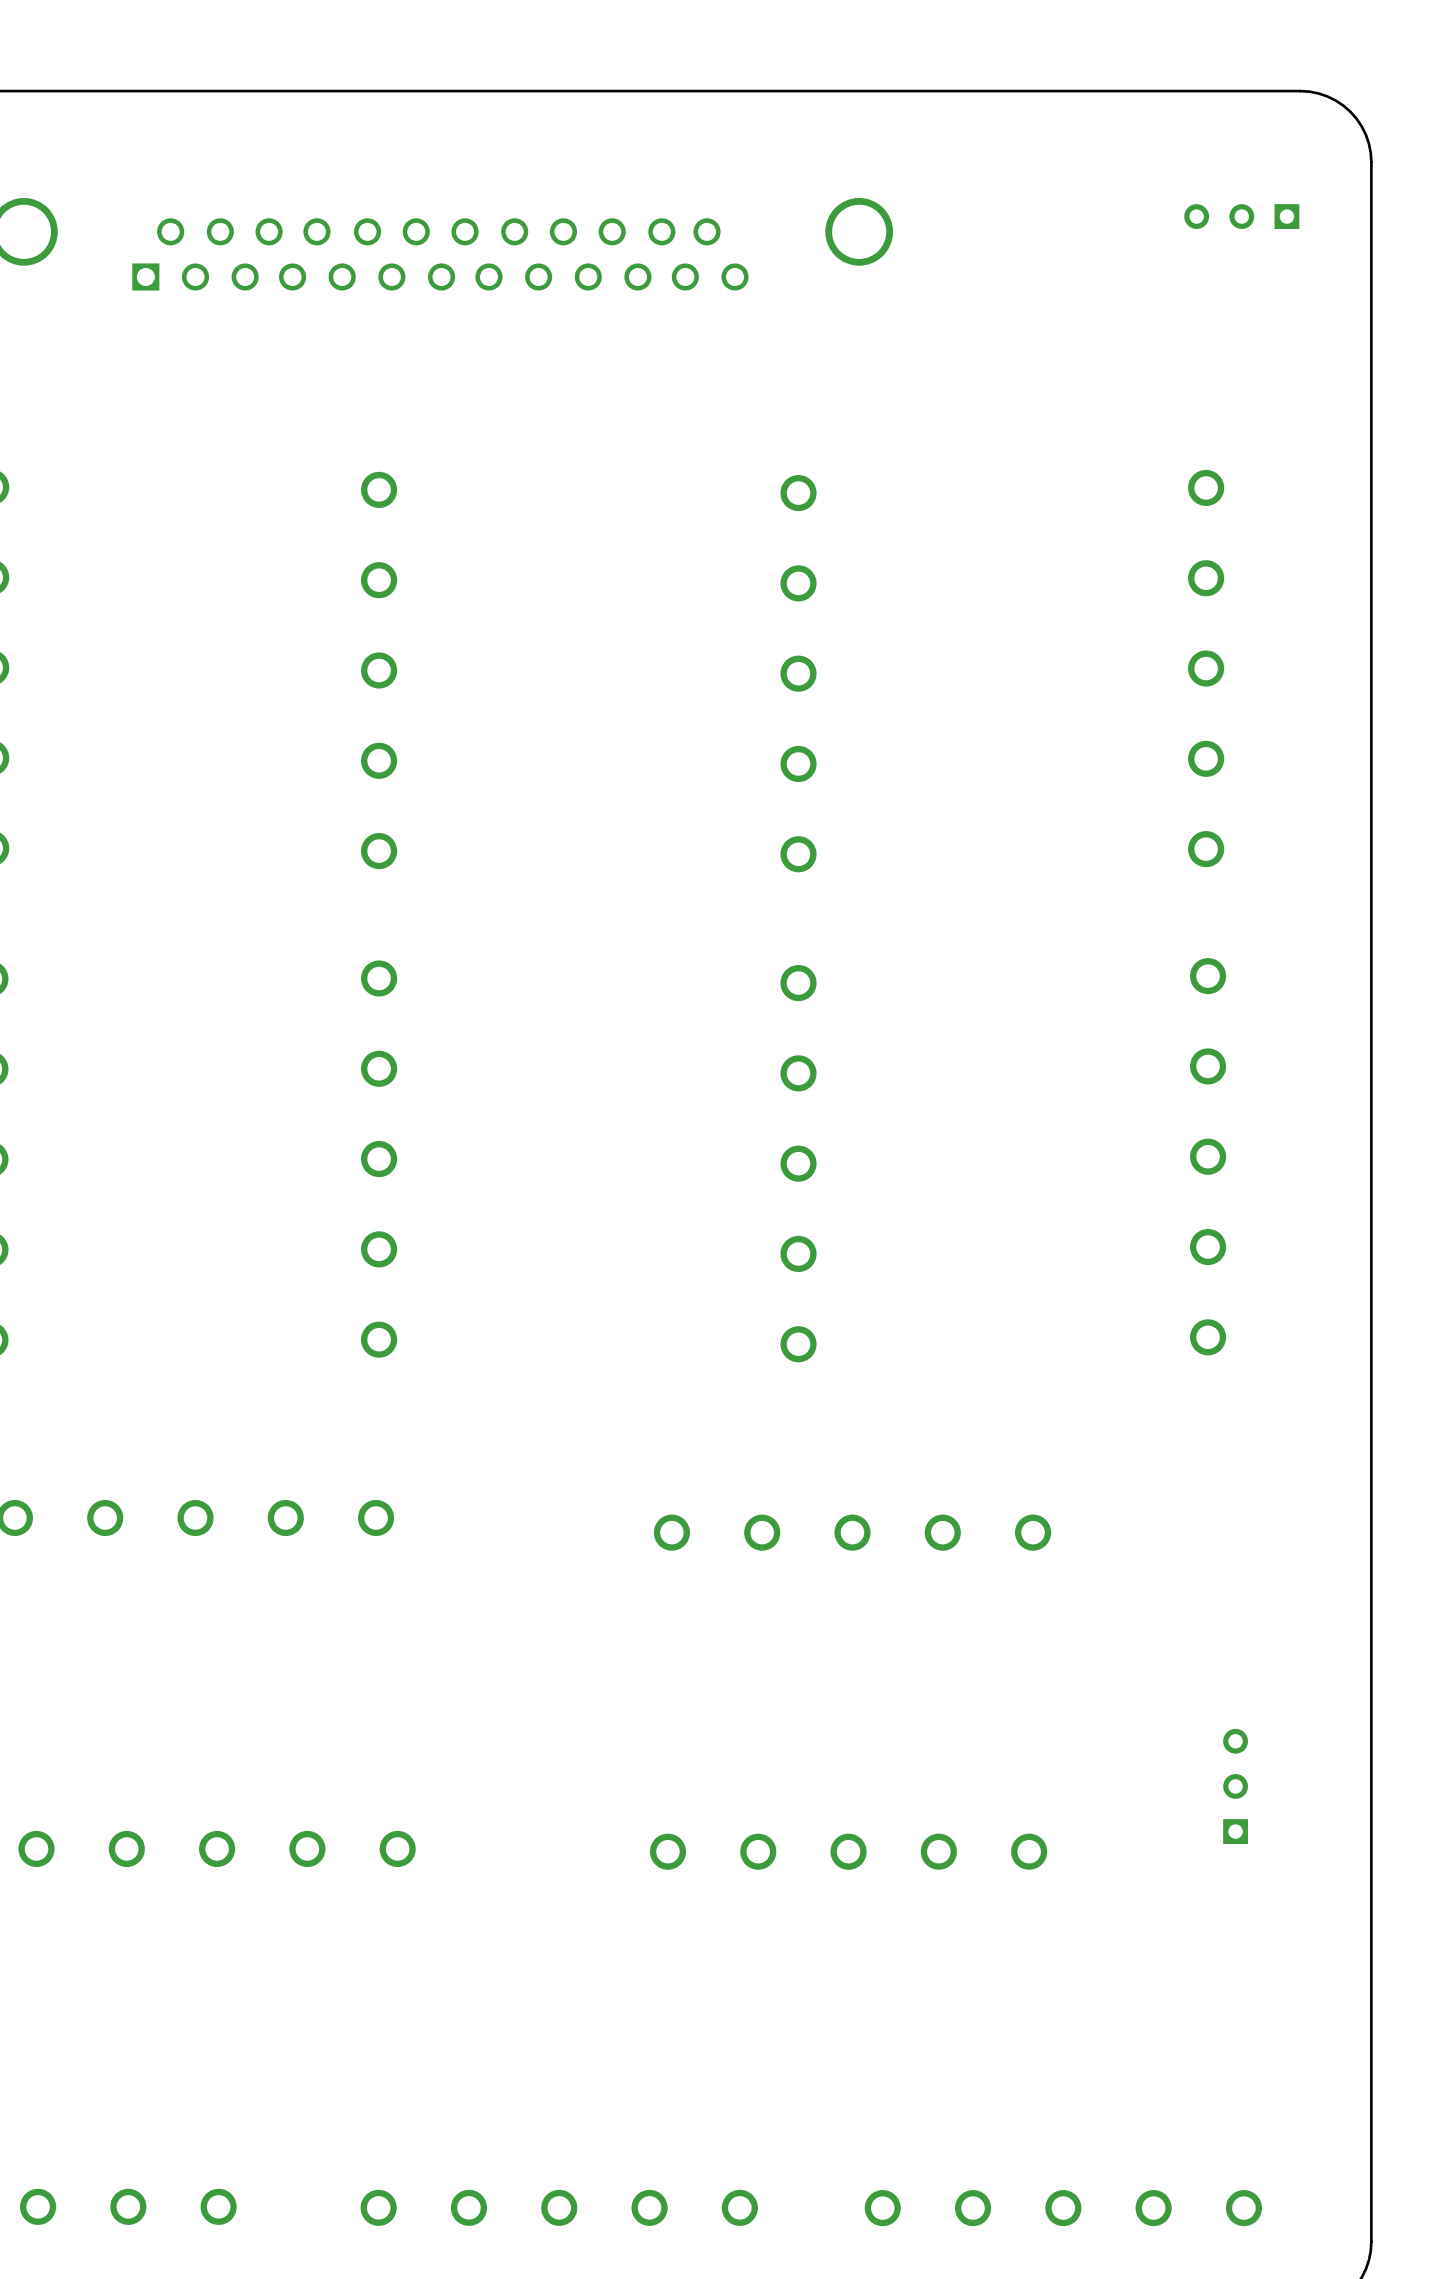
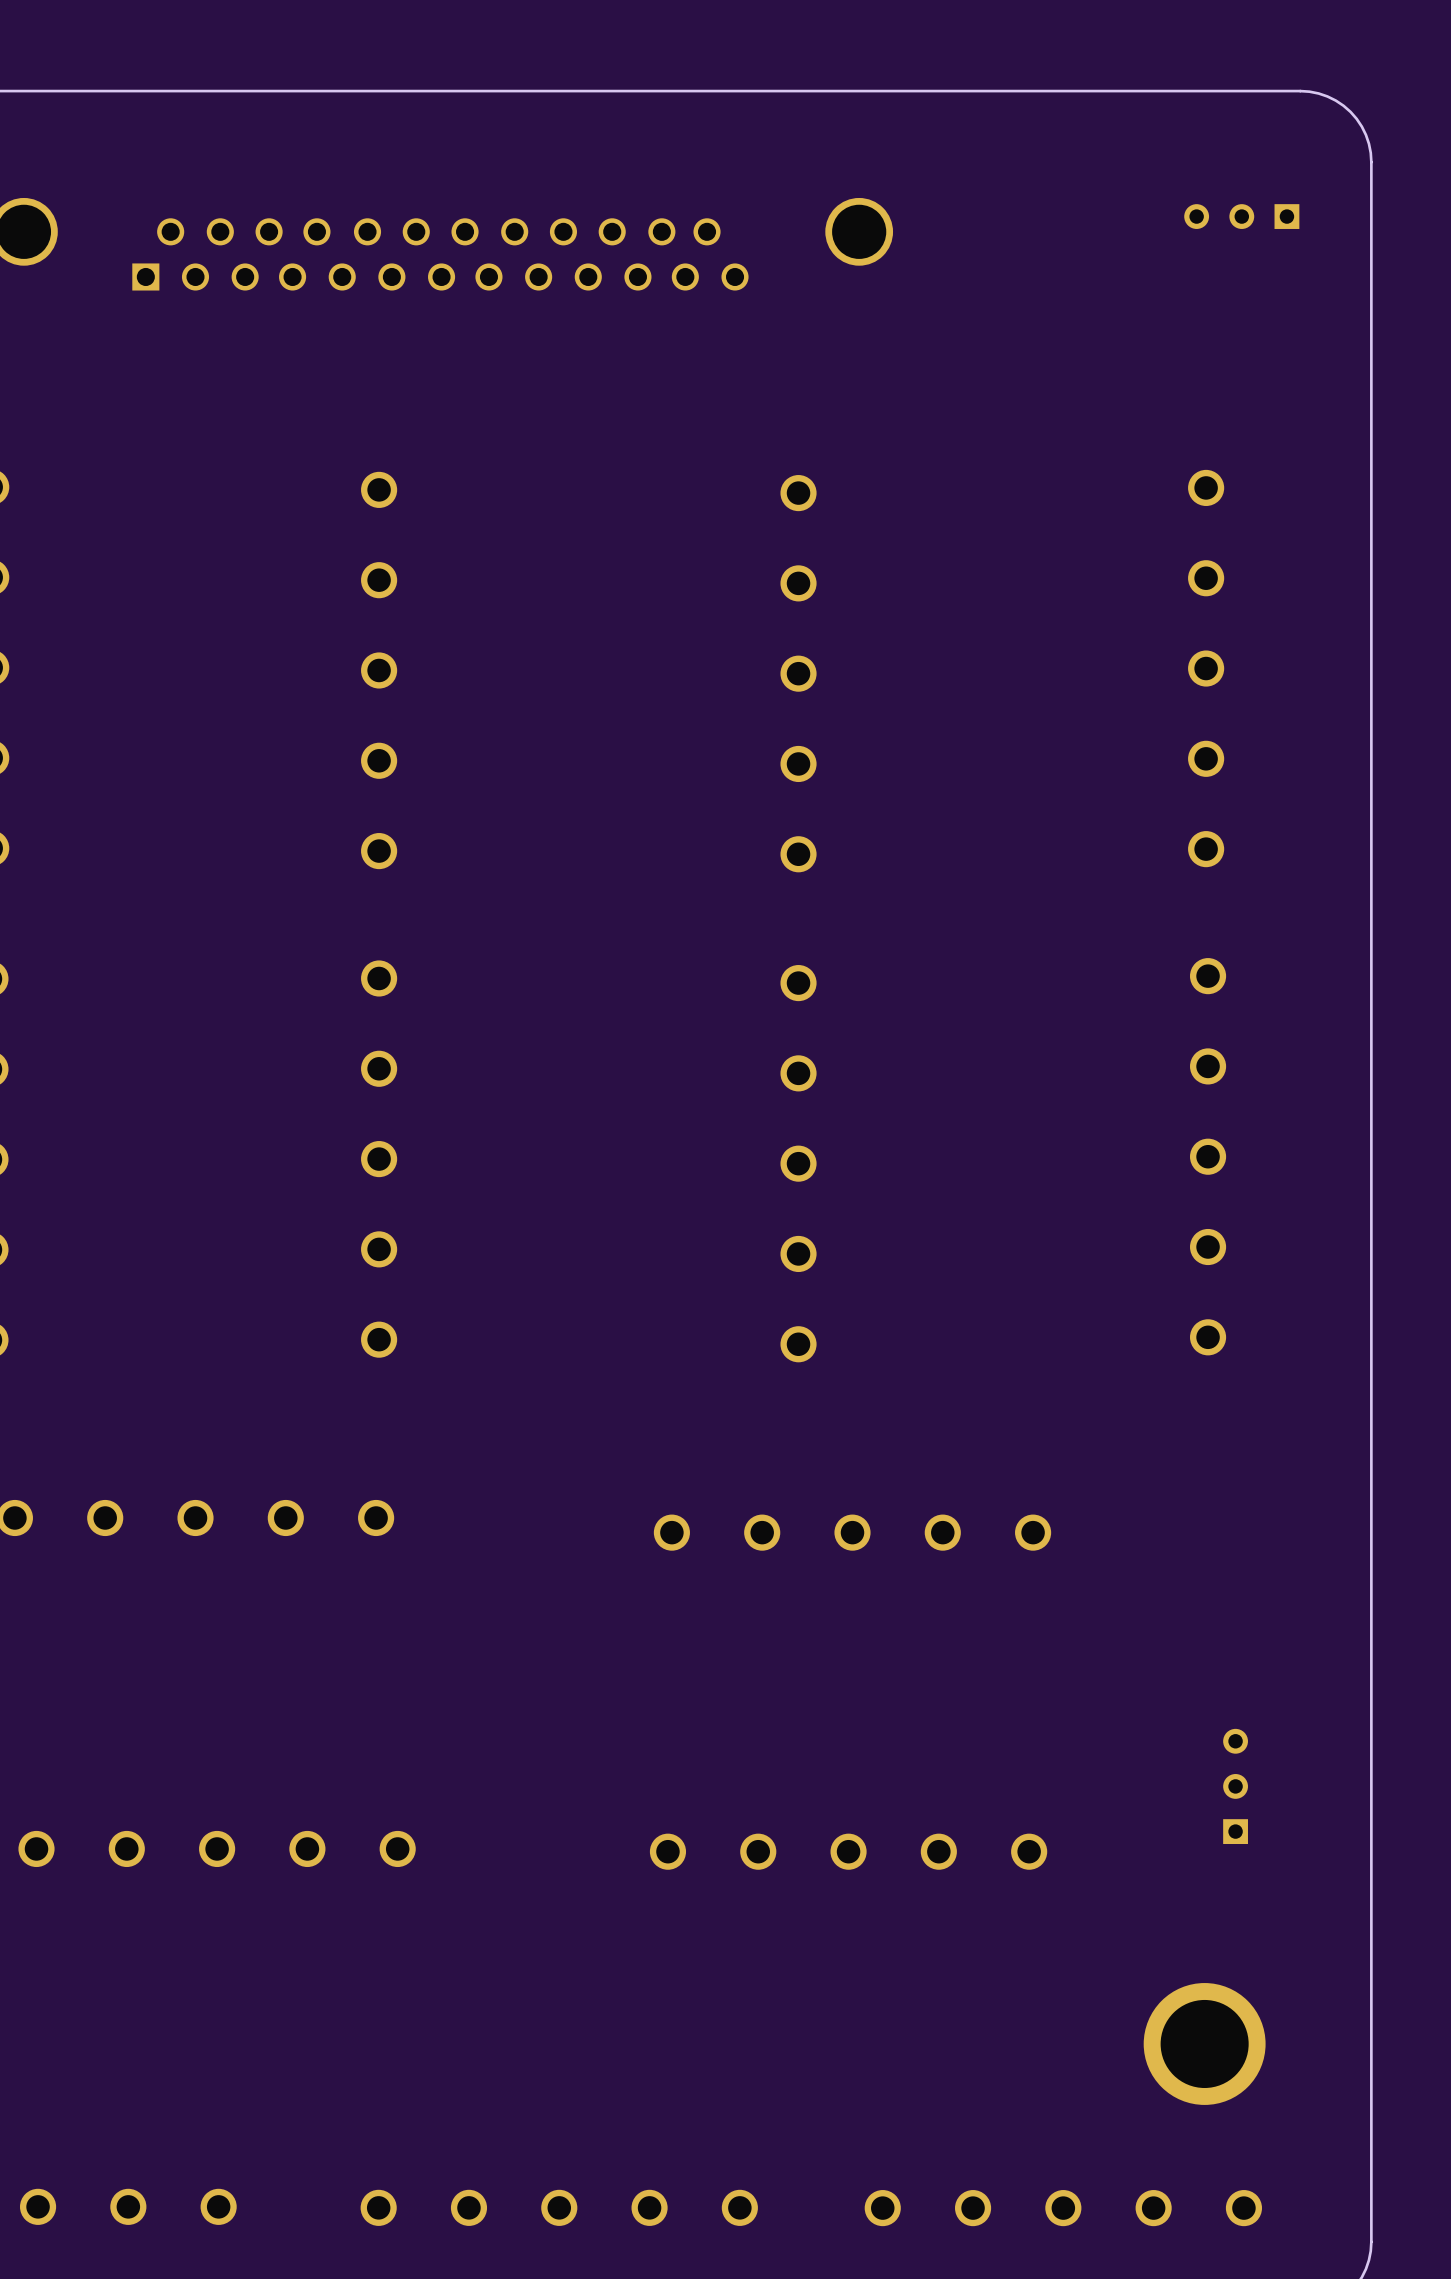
part: none -> (1204, 2043)

